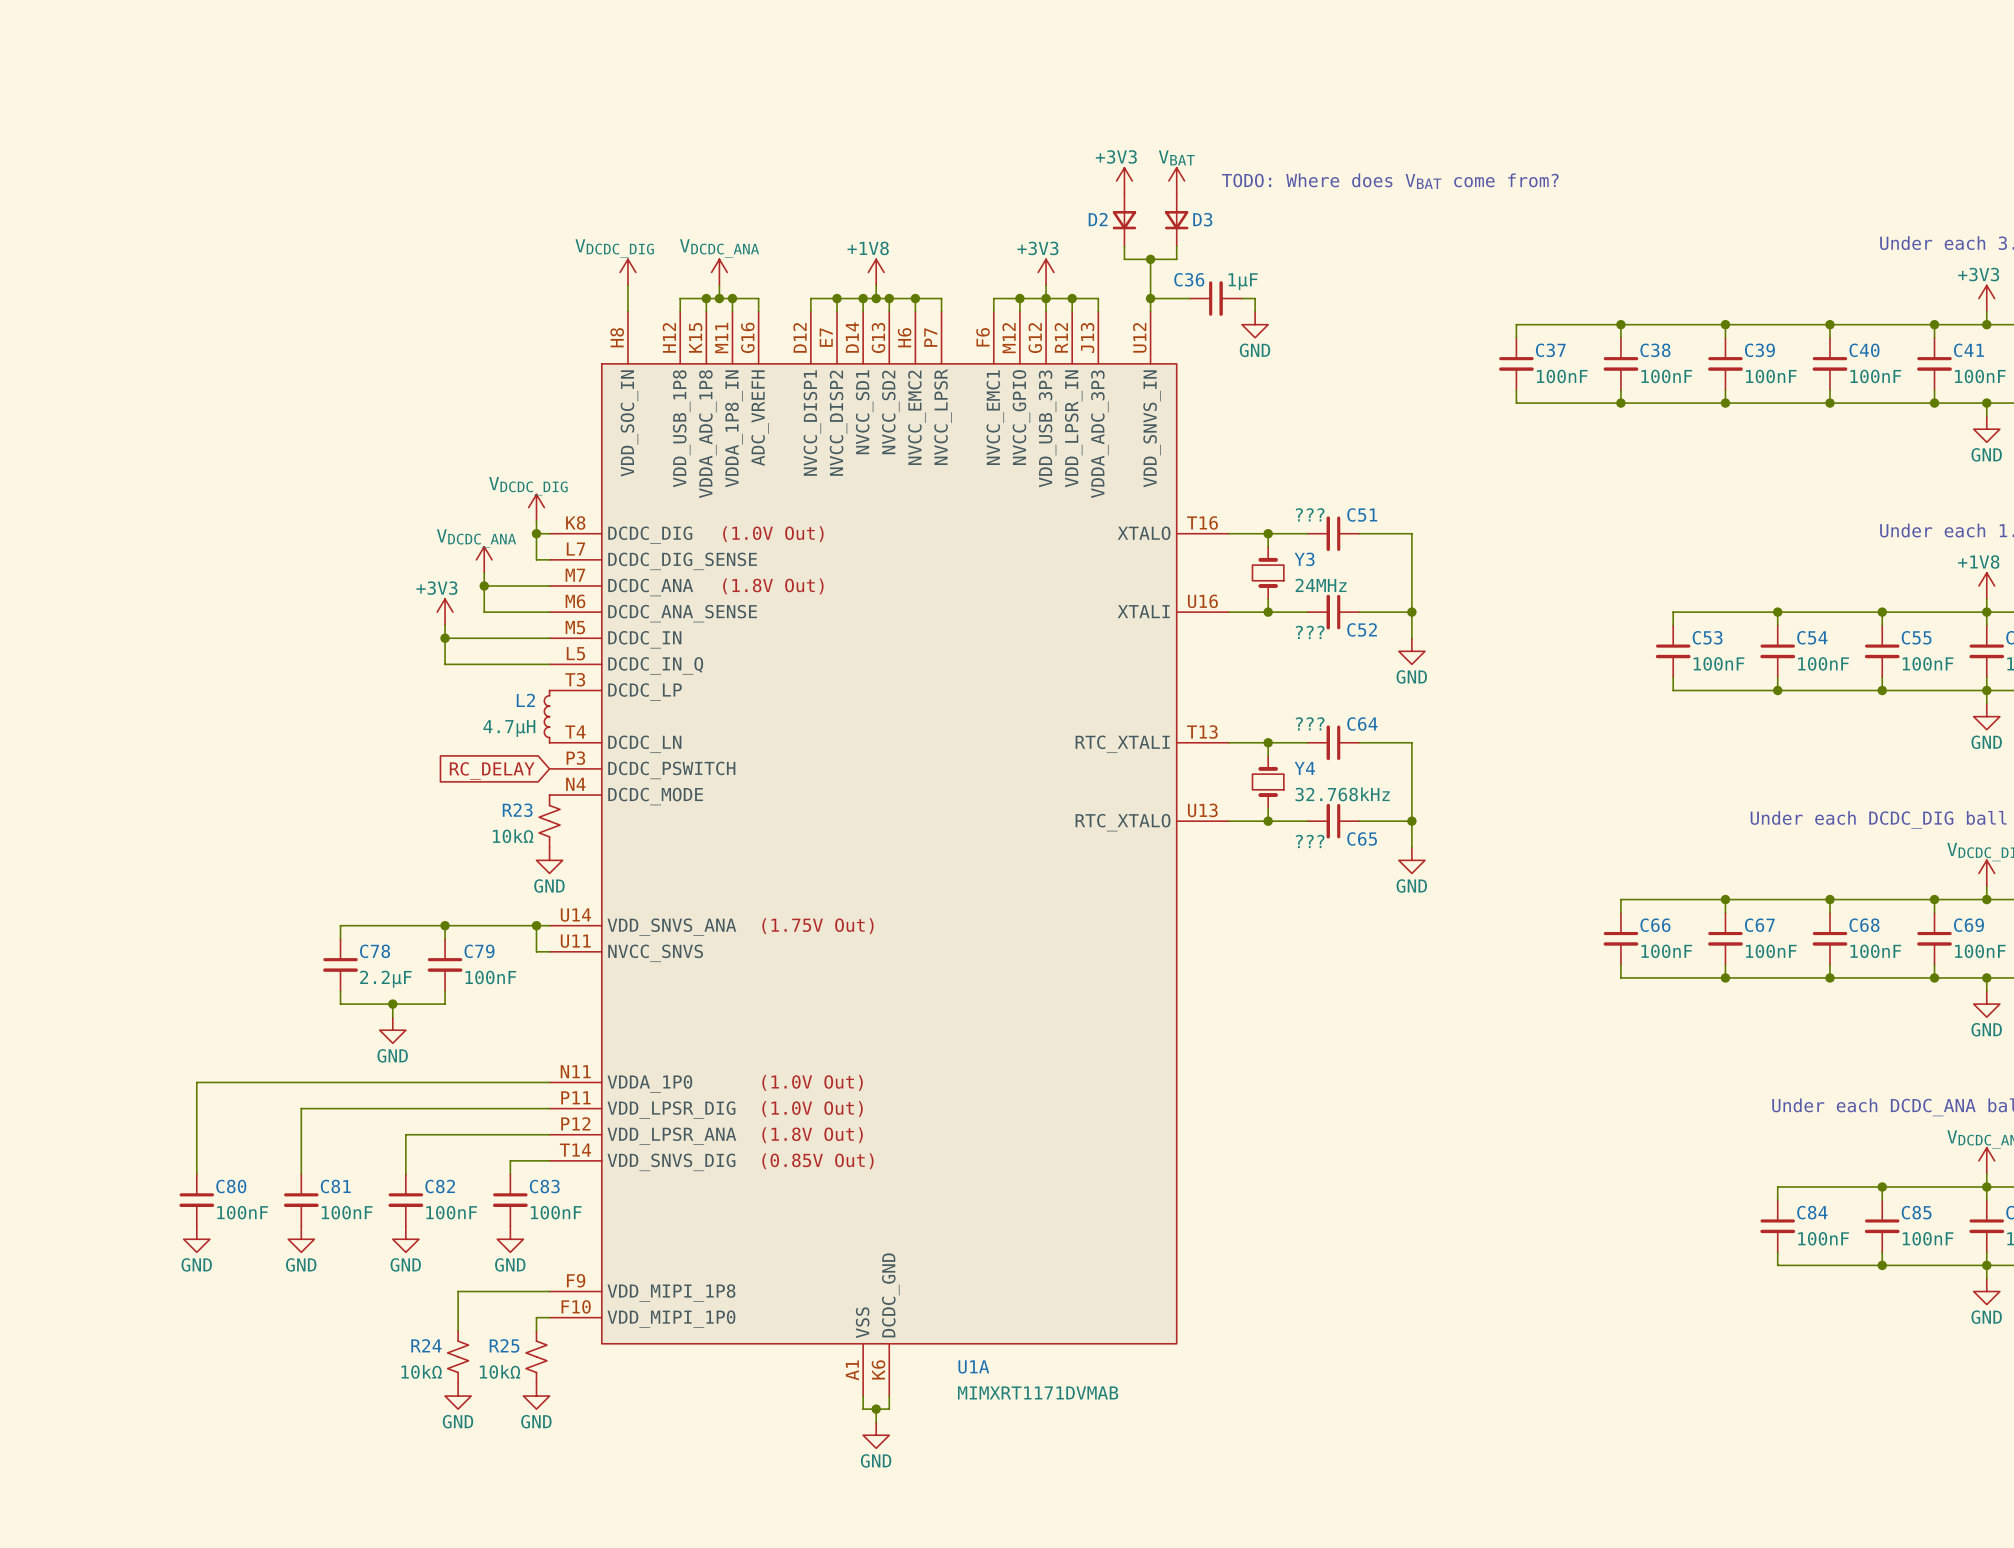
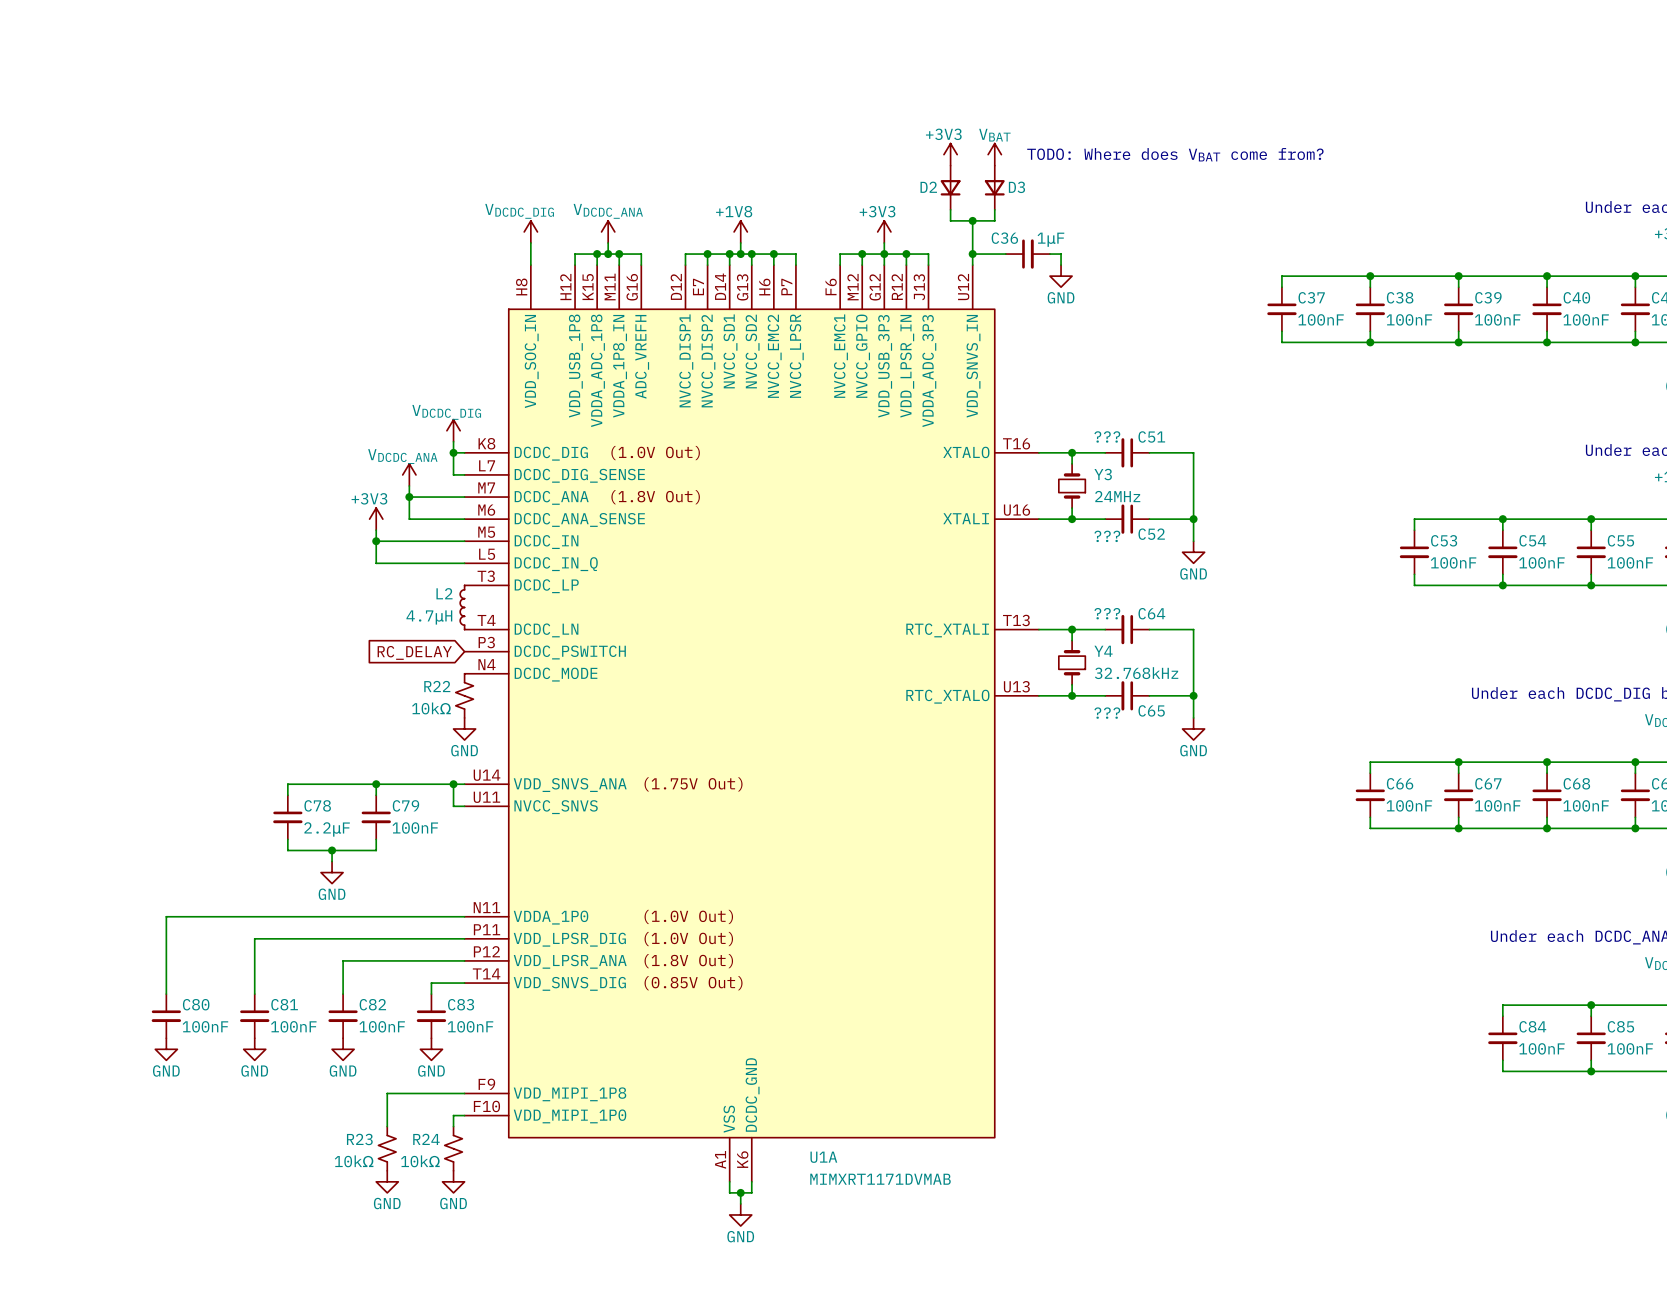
R23 name: R23 (517, 810) -> R22 (437, 686)
R24 name: R24 (426, 1345) -> R23 (359, 1139)
R25 name: R25 (504, 1345) -> R24 (426, 1139)

